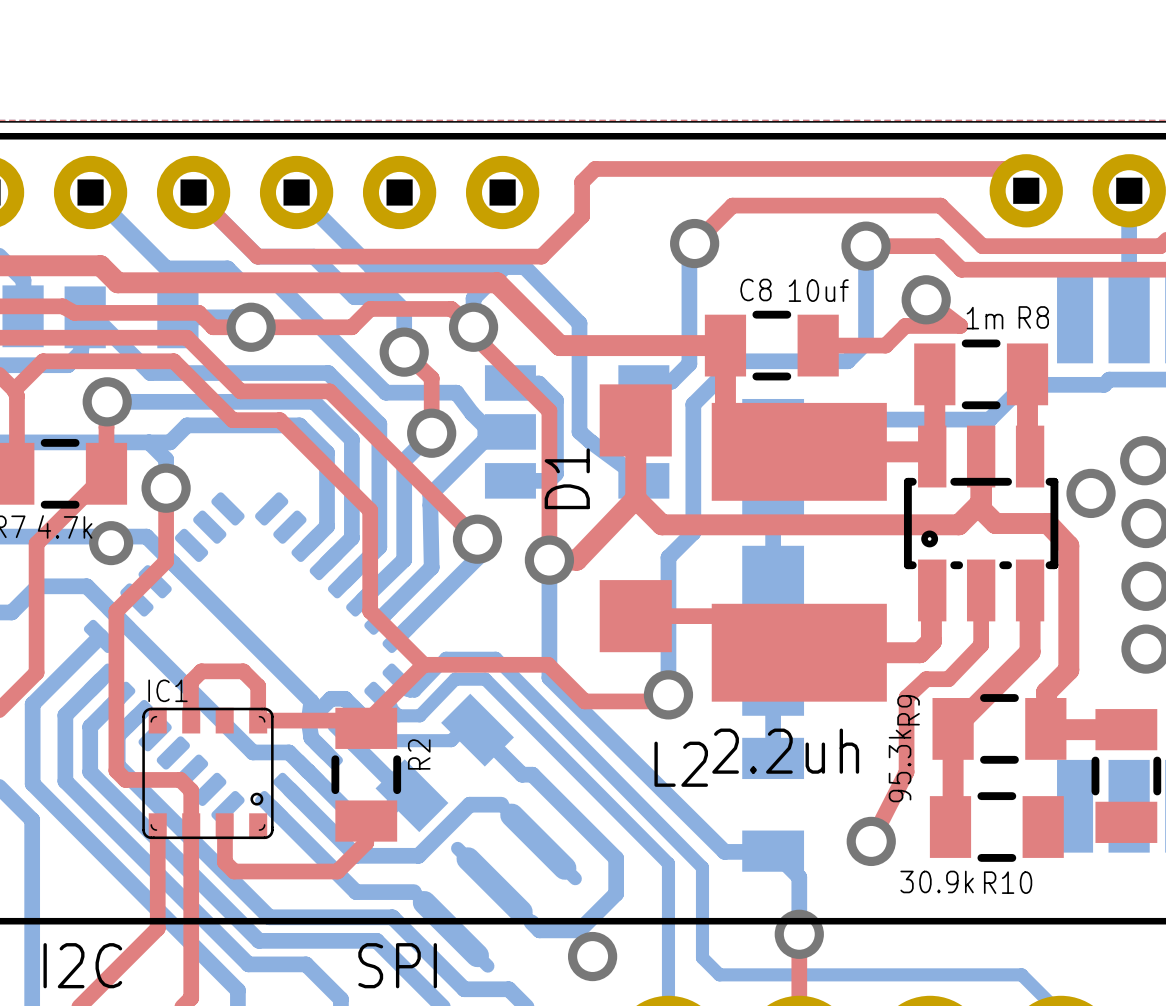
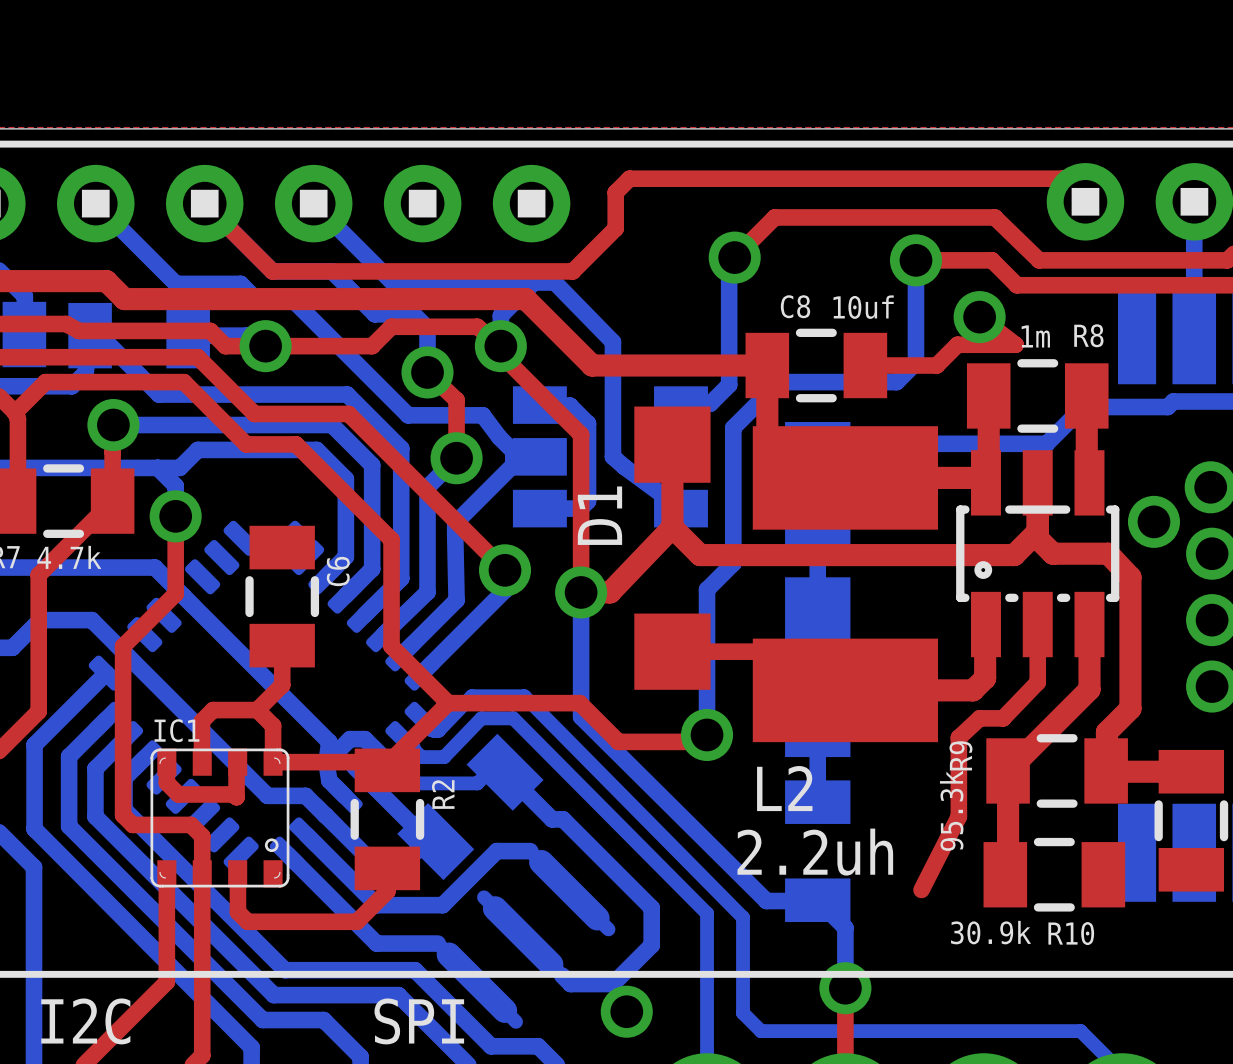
via: (111, 543) -> none
C6: none -> (282, 596)
top track: none -> (282, 645) (282, 685) (257, 710)
top track: none -> (166, 762) (166, 782) (178, 794) (233, 794) (236, 797) (237, 762)
L2 value position: 2.2uh (785, 751) -> 2.2uh (815, 852)
L2 name position: L2 (681, 764) -> L2 (784, 788)
via: (871, 841) -> none

